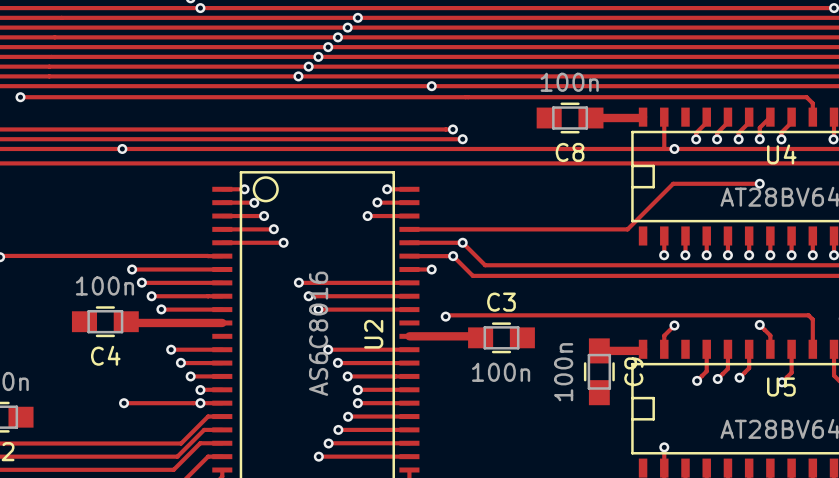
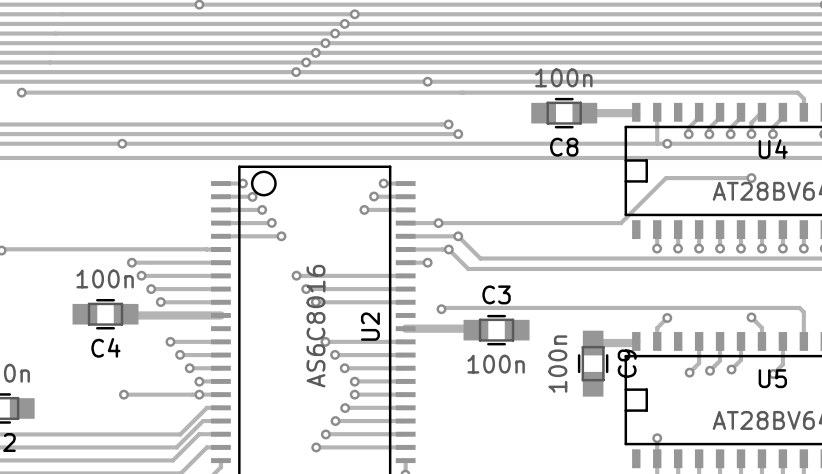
via: none -> (438, 223)

